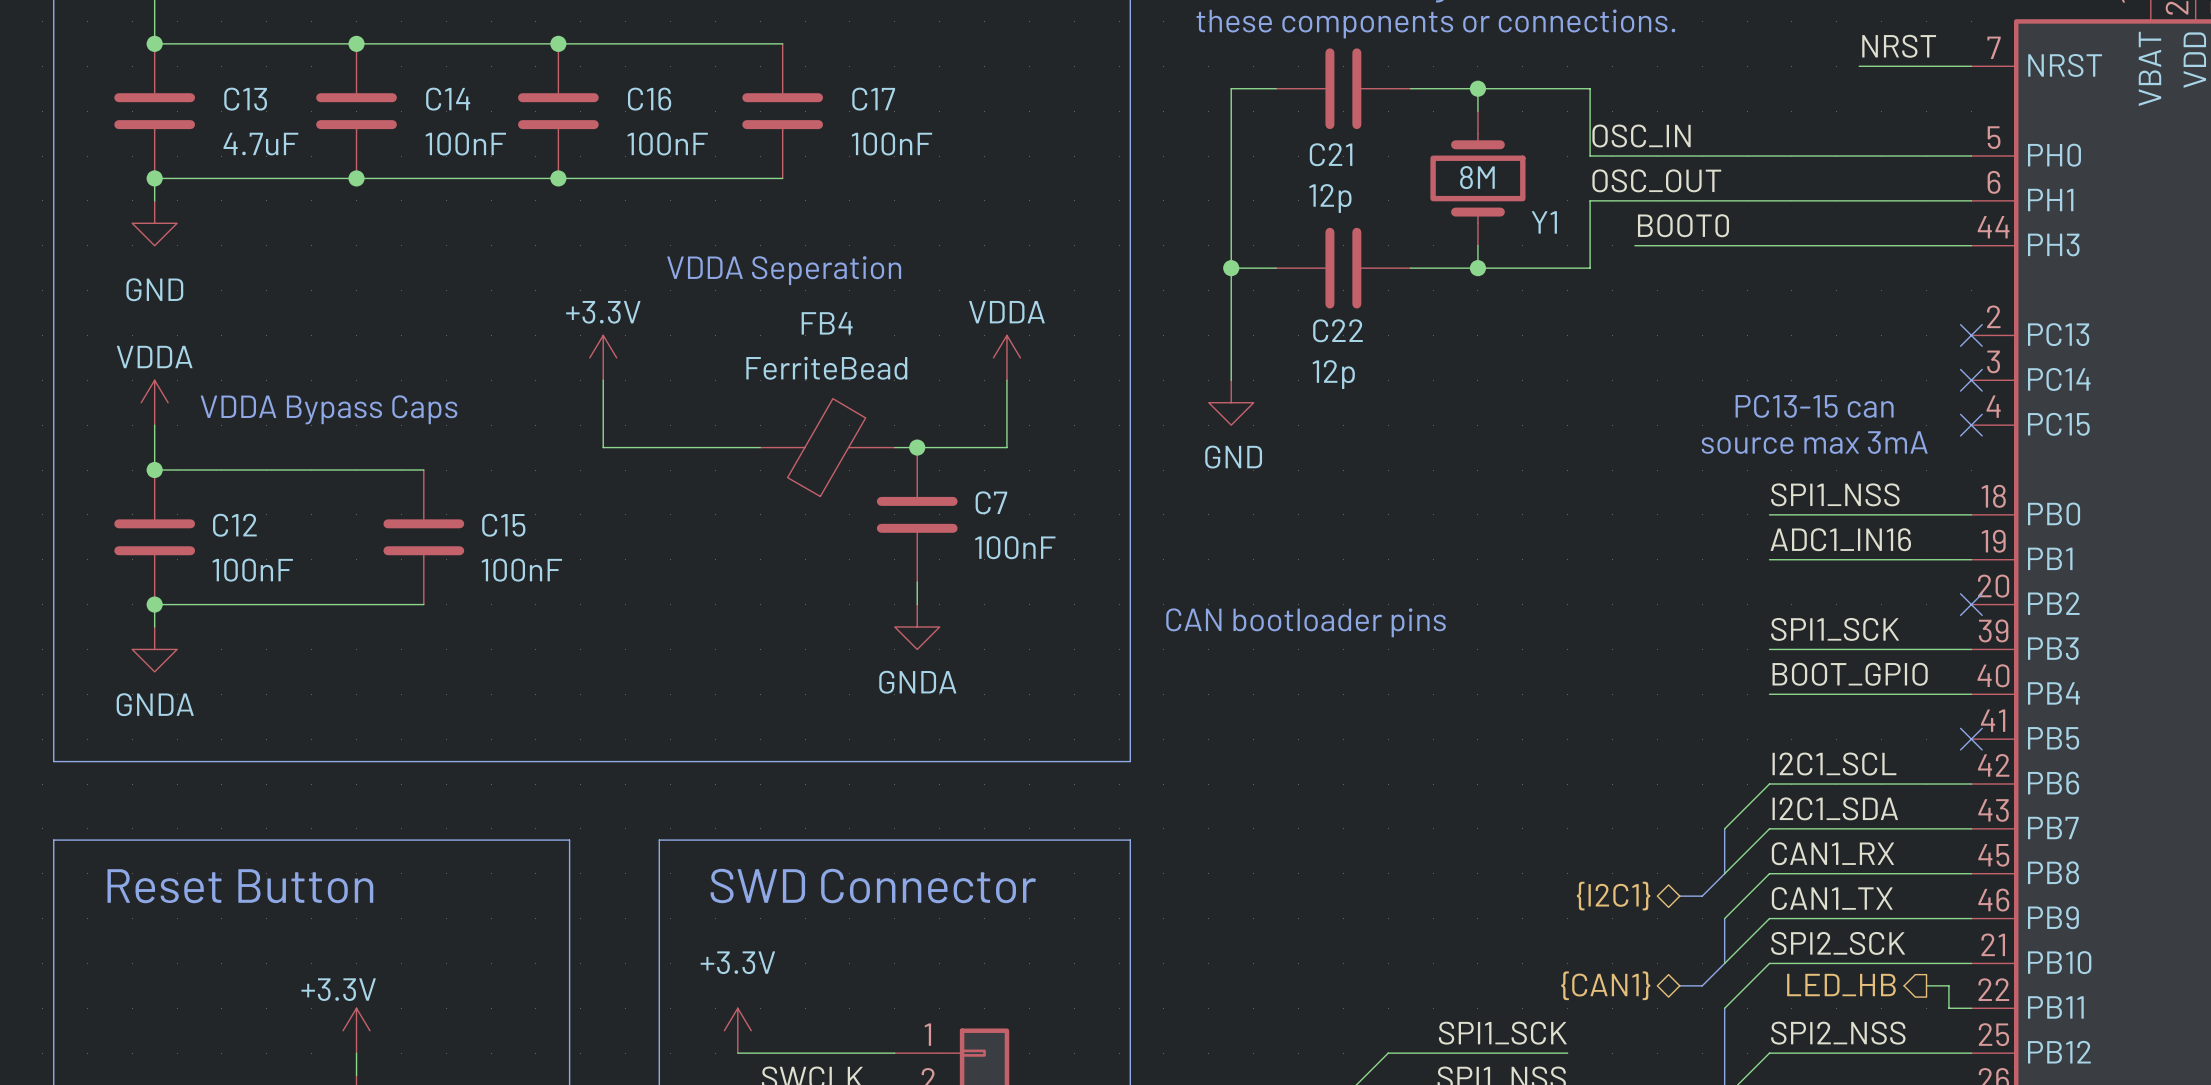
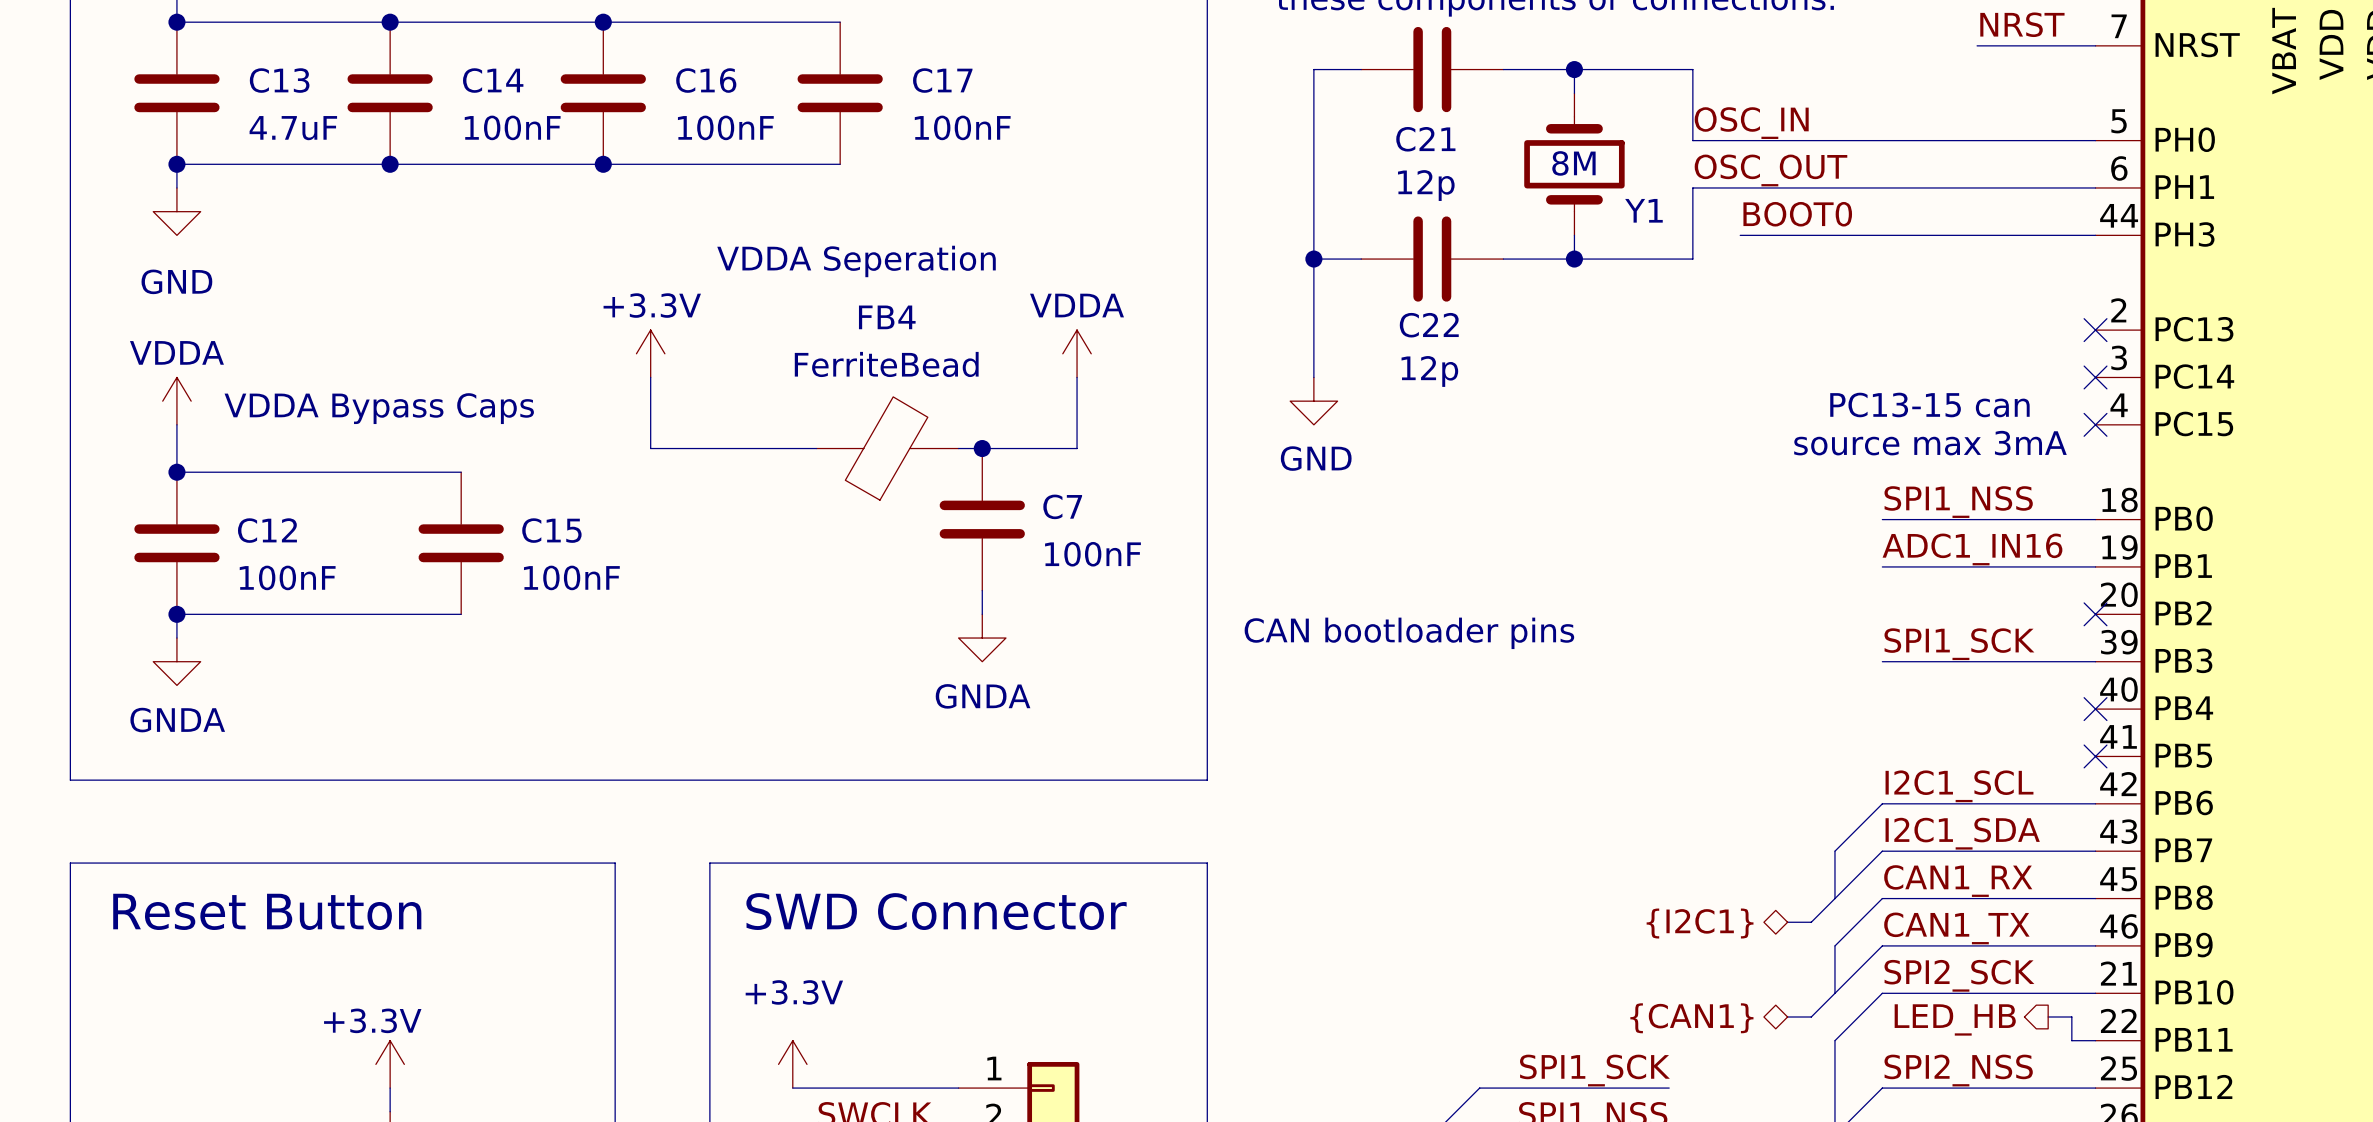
label: BOOT_GPIO (1850, 674) -> none
wire: (1769, 694) (1971, 694) -> none
no-connect mark: none -> (2095, 709)

